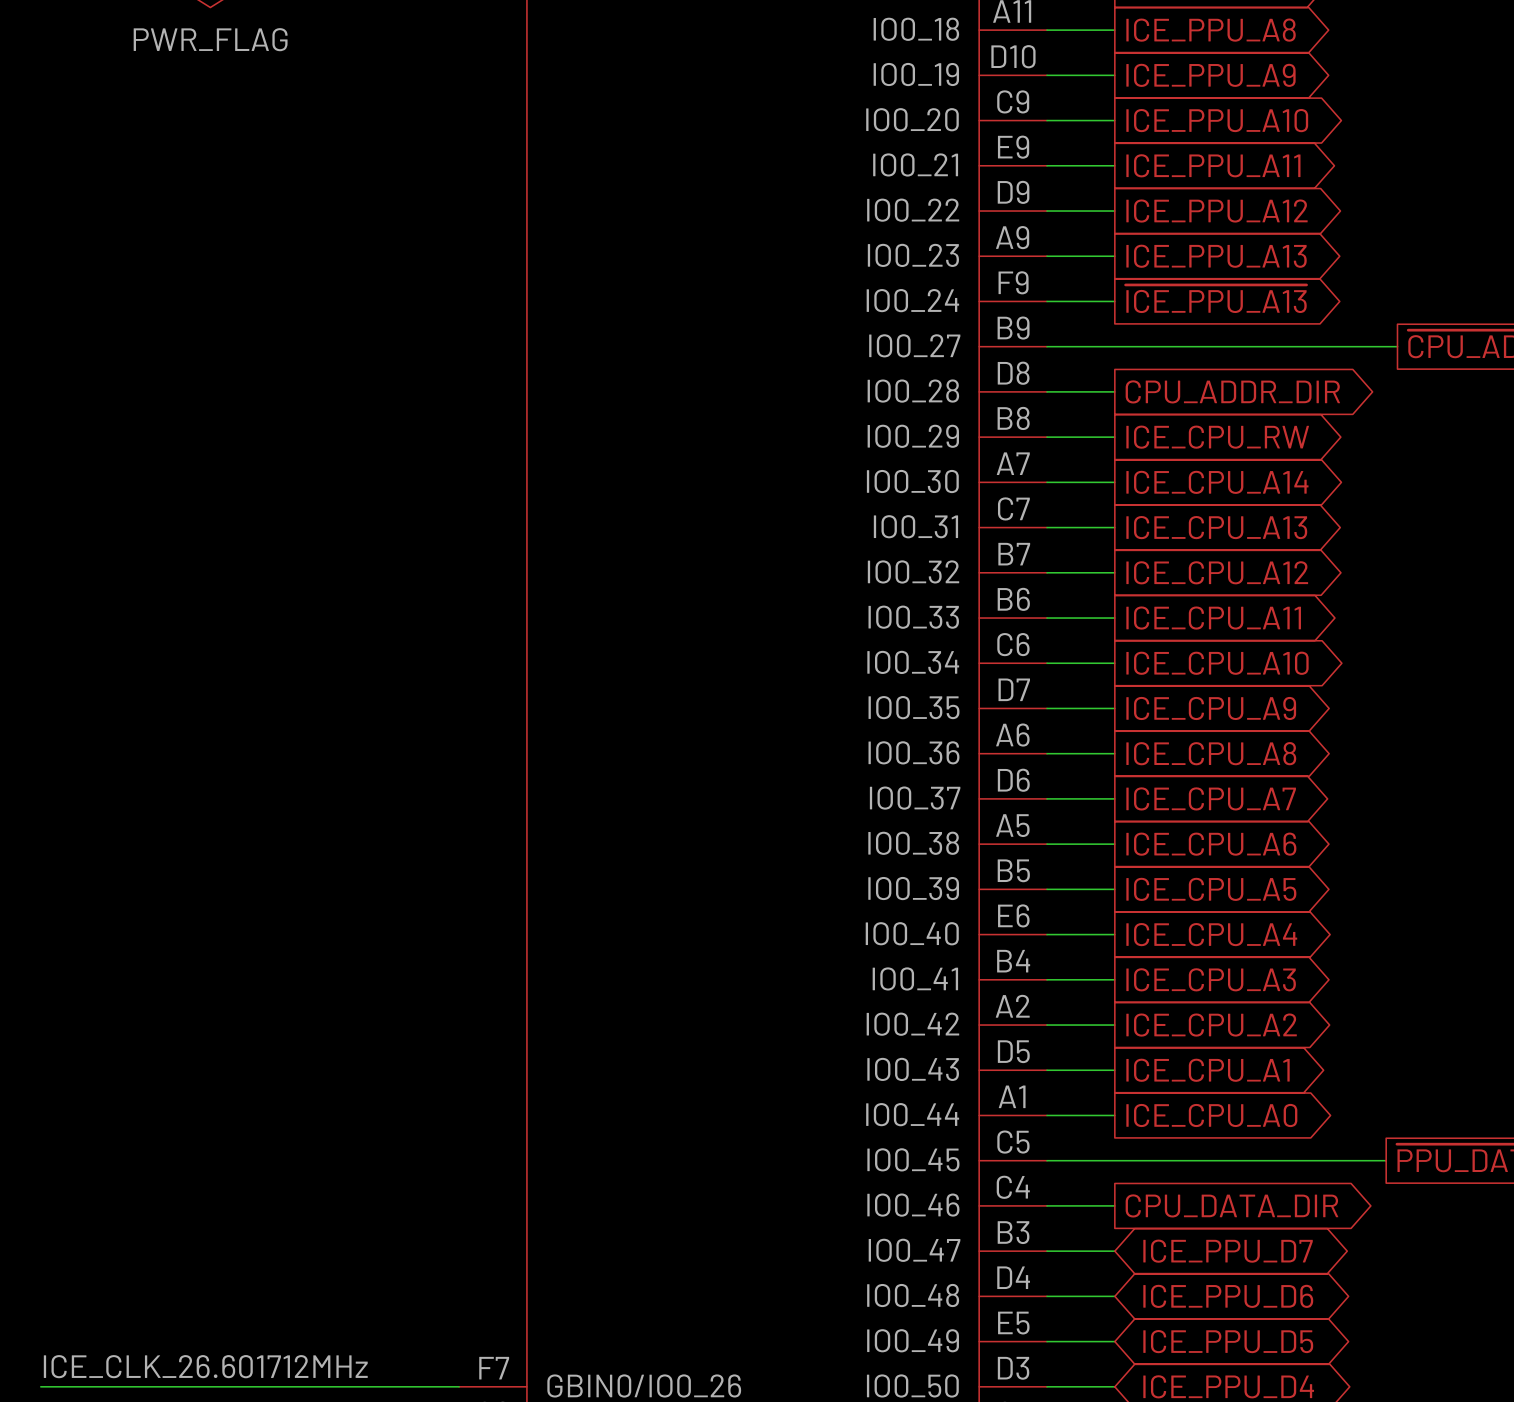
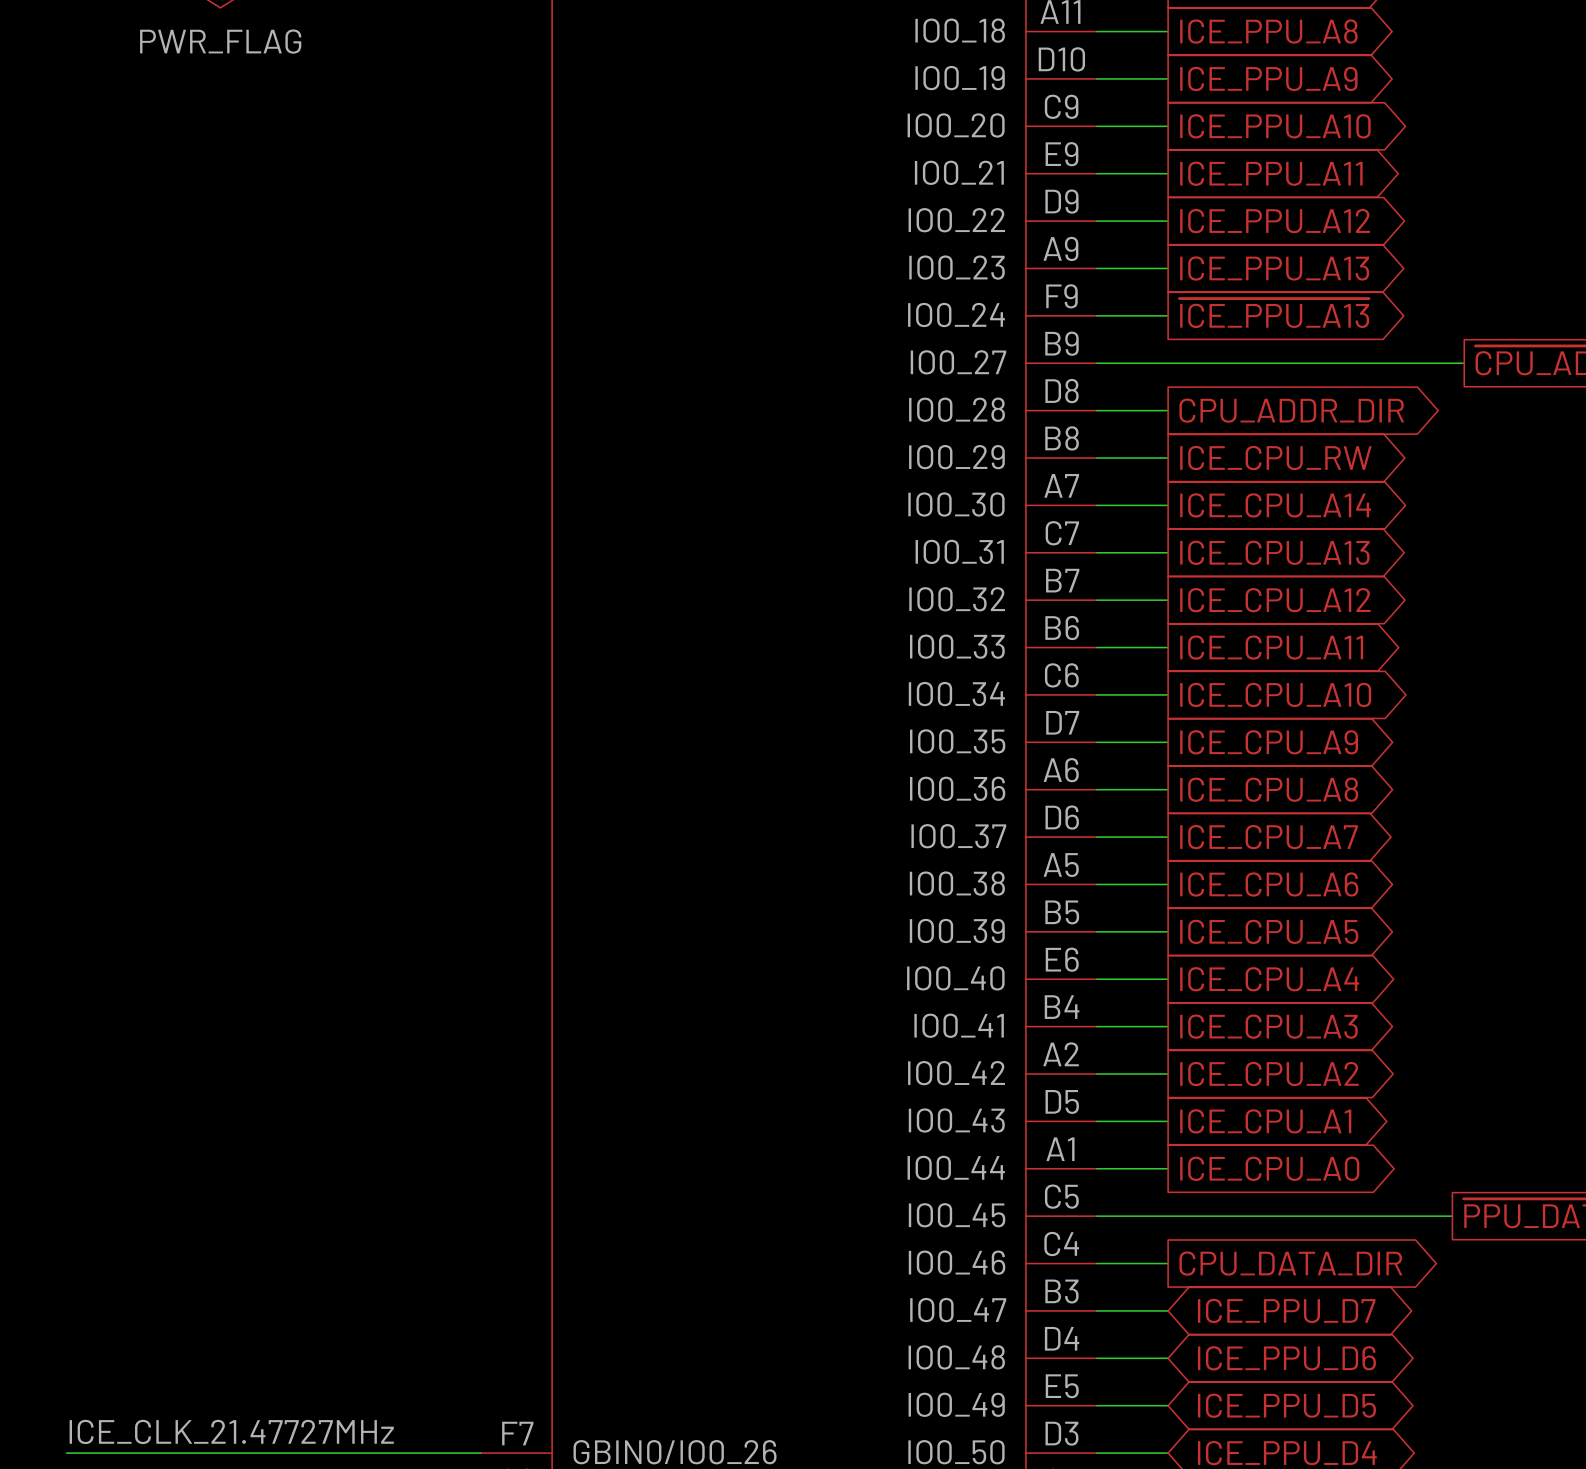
label: ICE_CLK_26.601712MHz (205, 1366) -> ICE_CLK_21.47727MHz (231, 1431)
wire: (40, 1386) (63, 1386) -> none

